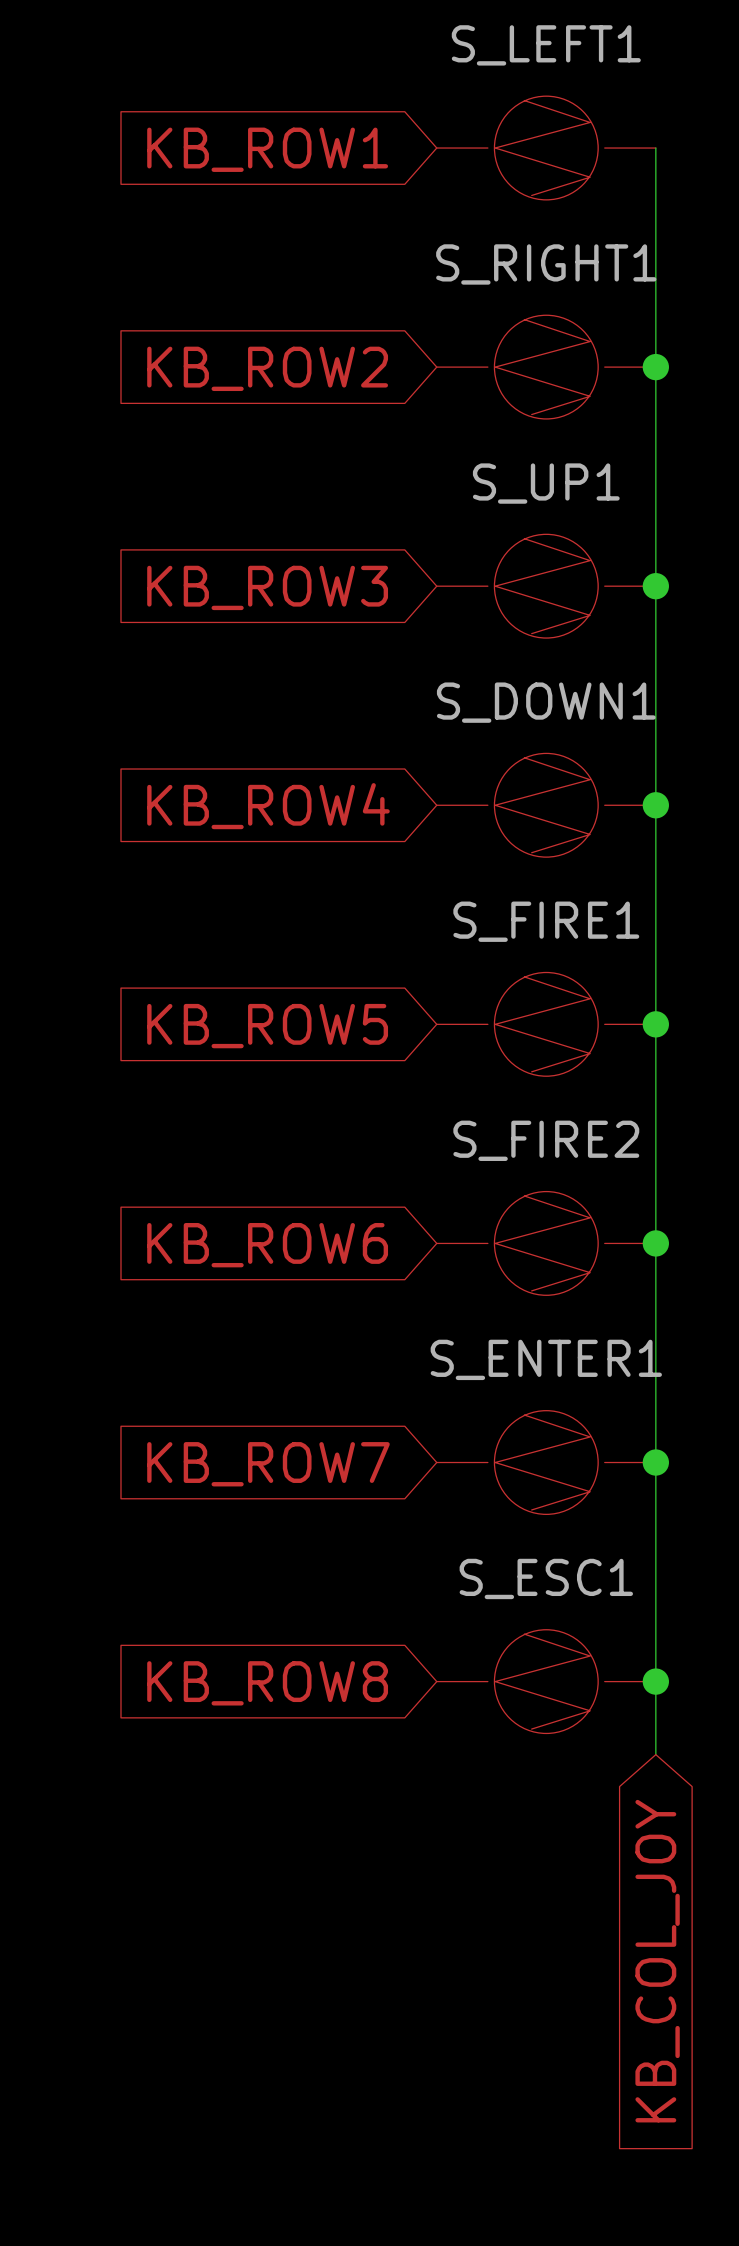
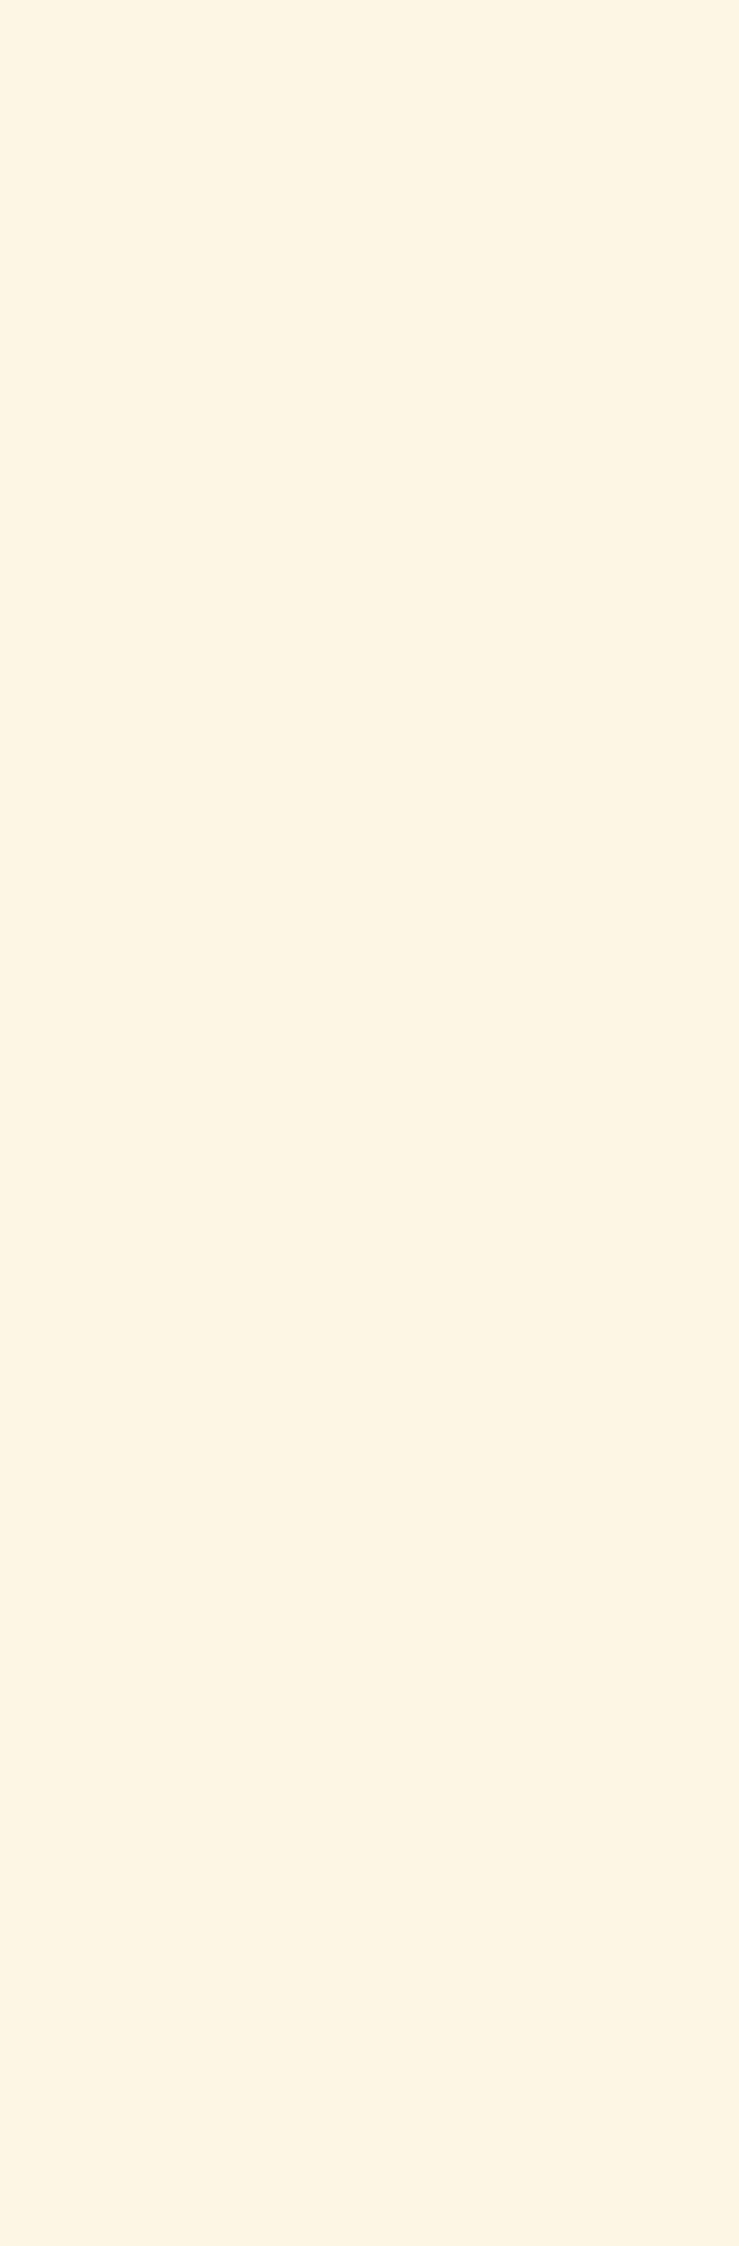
S_LEFT1: (546, 148) -> none
wire: (655, 148) (655, 1754) -> none
global label: KB_ROW1 (267, 149) -> none
S_RIGHT1: (546, 367) -> none
junction: (655, 367) -> none
global label: KB_ROW2 (267, 368) -> none
S_UP1: (546, 586) -> none
junction: (655, 586) -> none
global label: KB_ROW3 (267, 587) -> none
S_DOWN1: (546, 805) -> none
junction: (655, 805) -> none
global label: KB_ROW4 (268, 806) -> none
S_FIRE1: (546, 1024) -> none
junction: (655, 1024) -> none
global label: KB_ROW5 (267, 1026) -> none
S_FIRE2: (546, 1243) -> none
junction: (655, 1243) -> none
global label: KB_ROW6 (267, 1245) -> none
S_ENTER1: (546, 1462) -> none
junction: (655, 1462) -> none
global label: KB_ROW7 (268, 1464) -> none
S_ESC1: (546, 1681) -> none
junction: (655, 1681) -> none
global label: KB_ROW8 (267, 1683) -> none
global label: KB_COL_JOY (657, 1961) -> none

